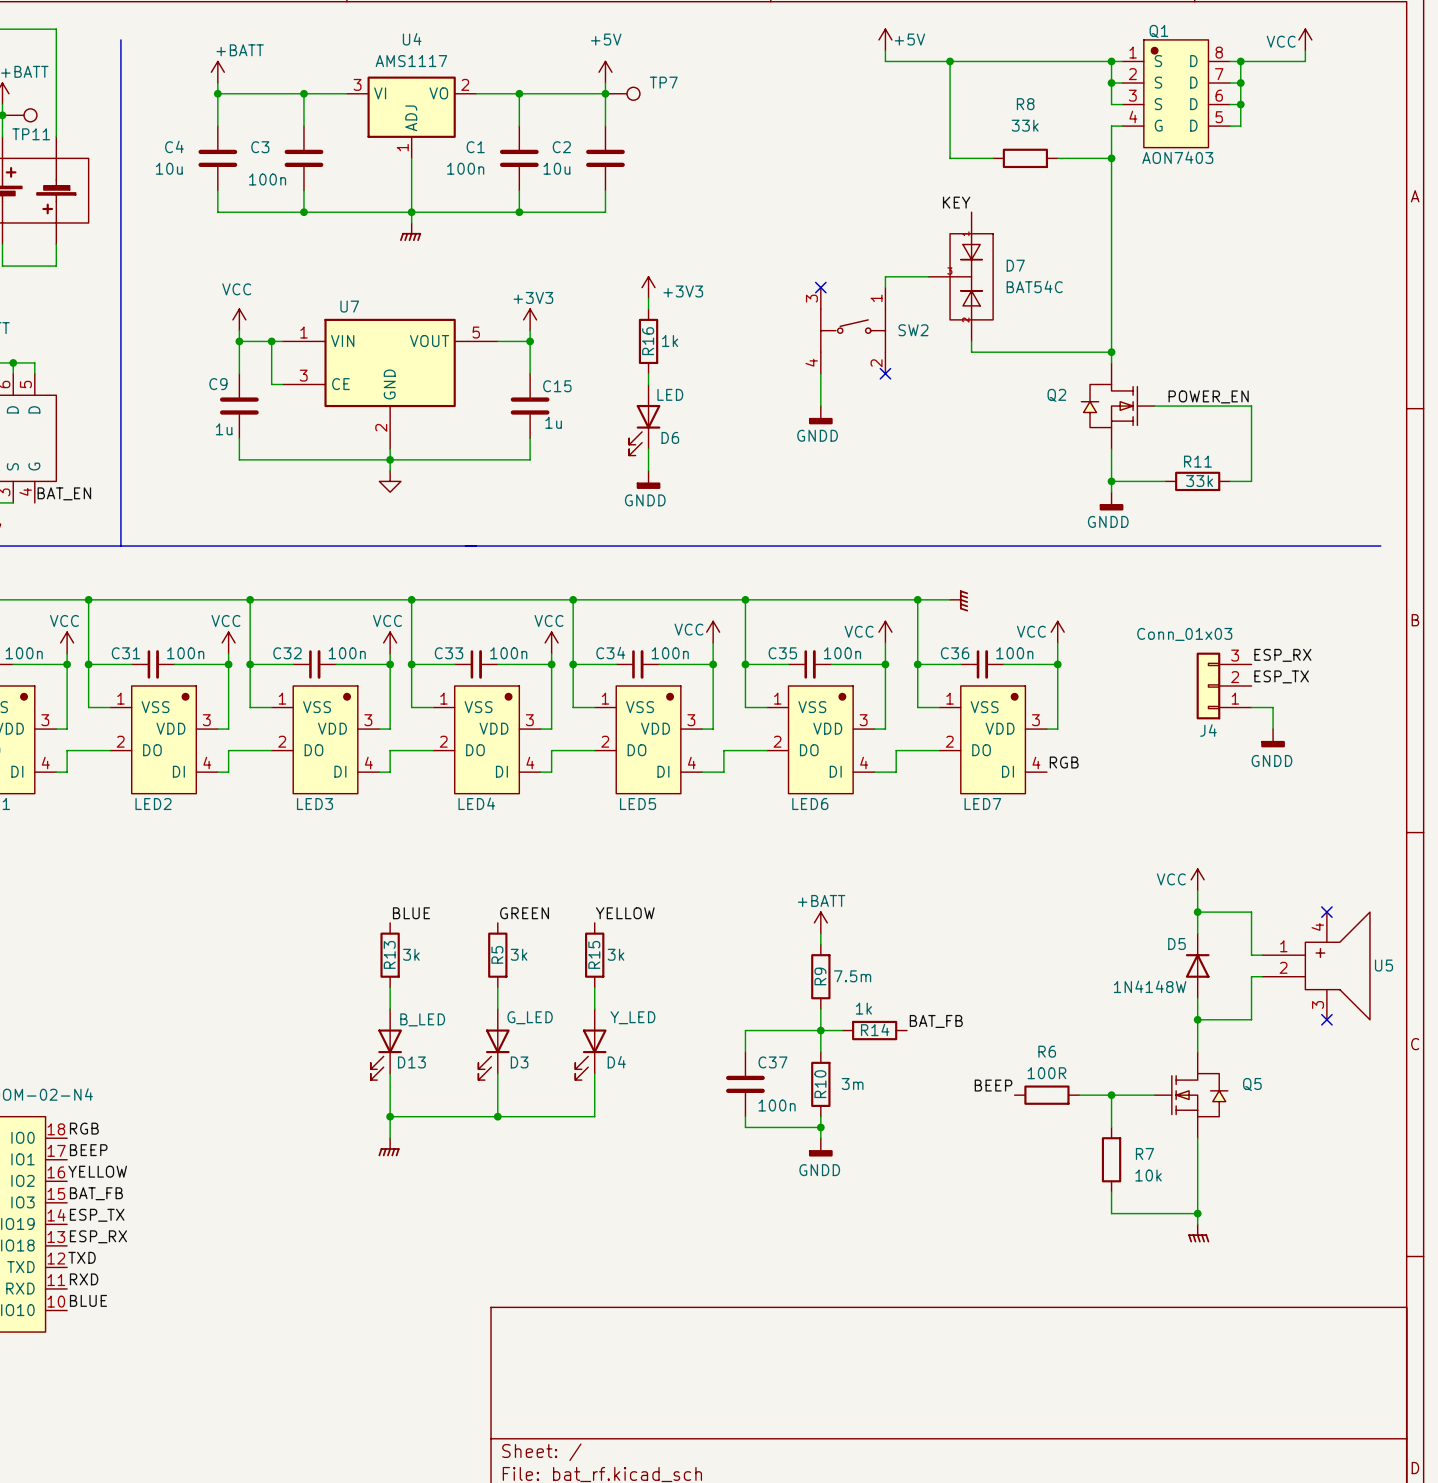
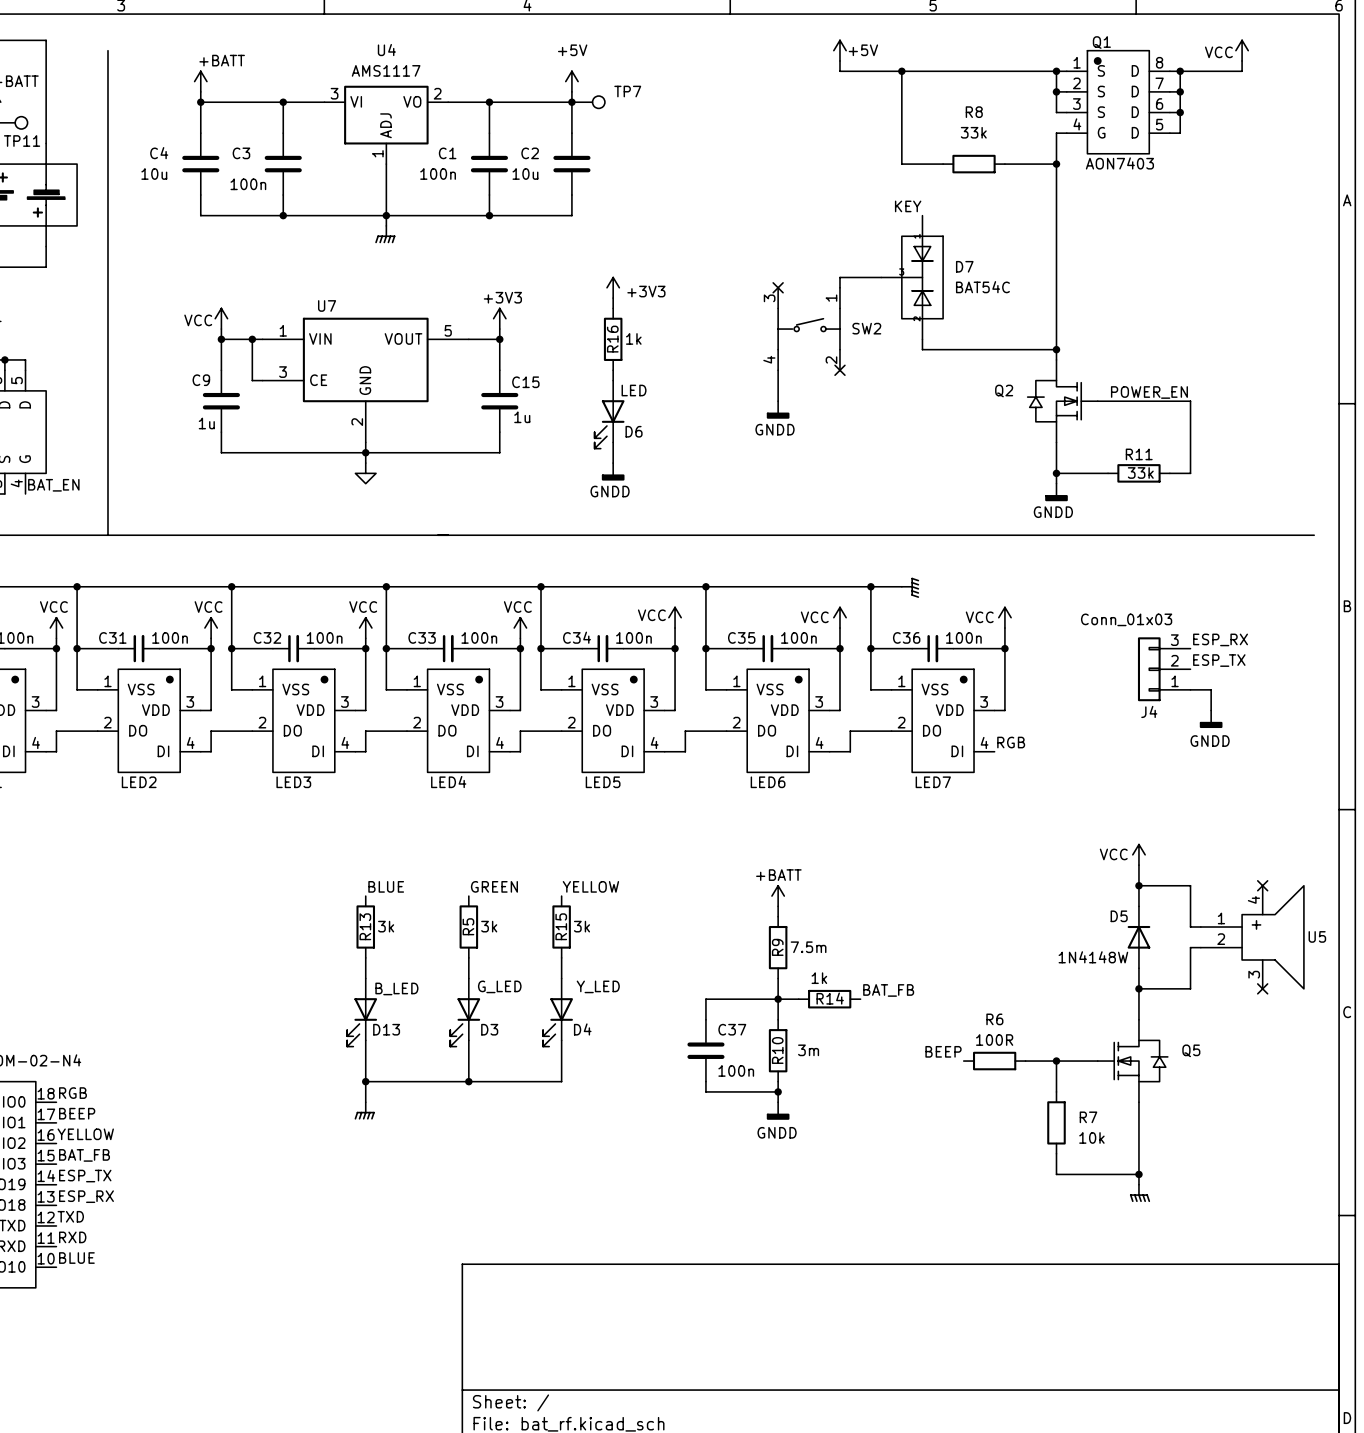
power symbol text position: VCC (236, 289) -> VCC (198, 320)

